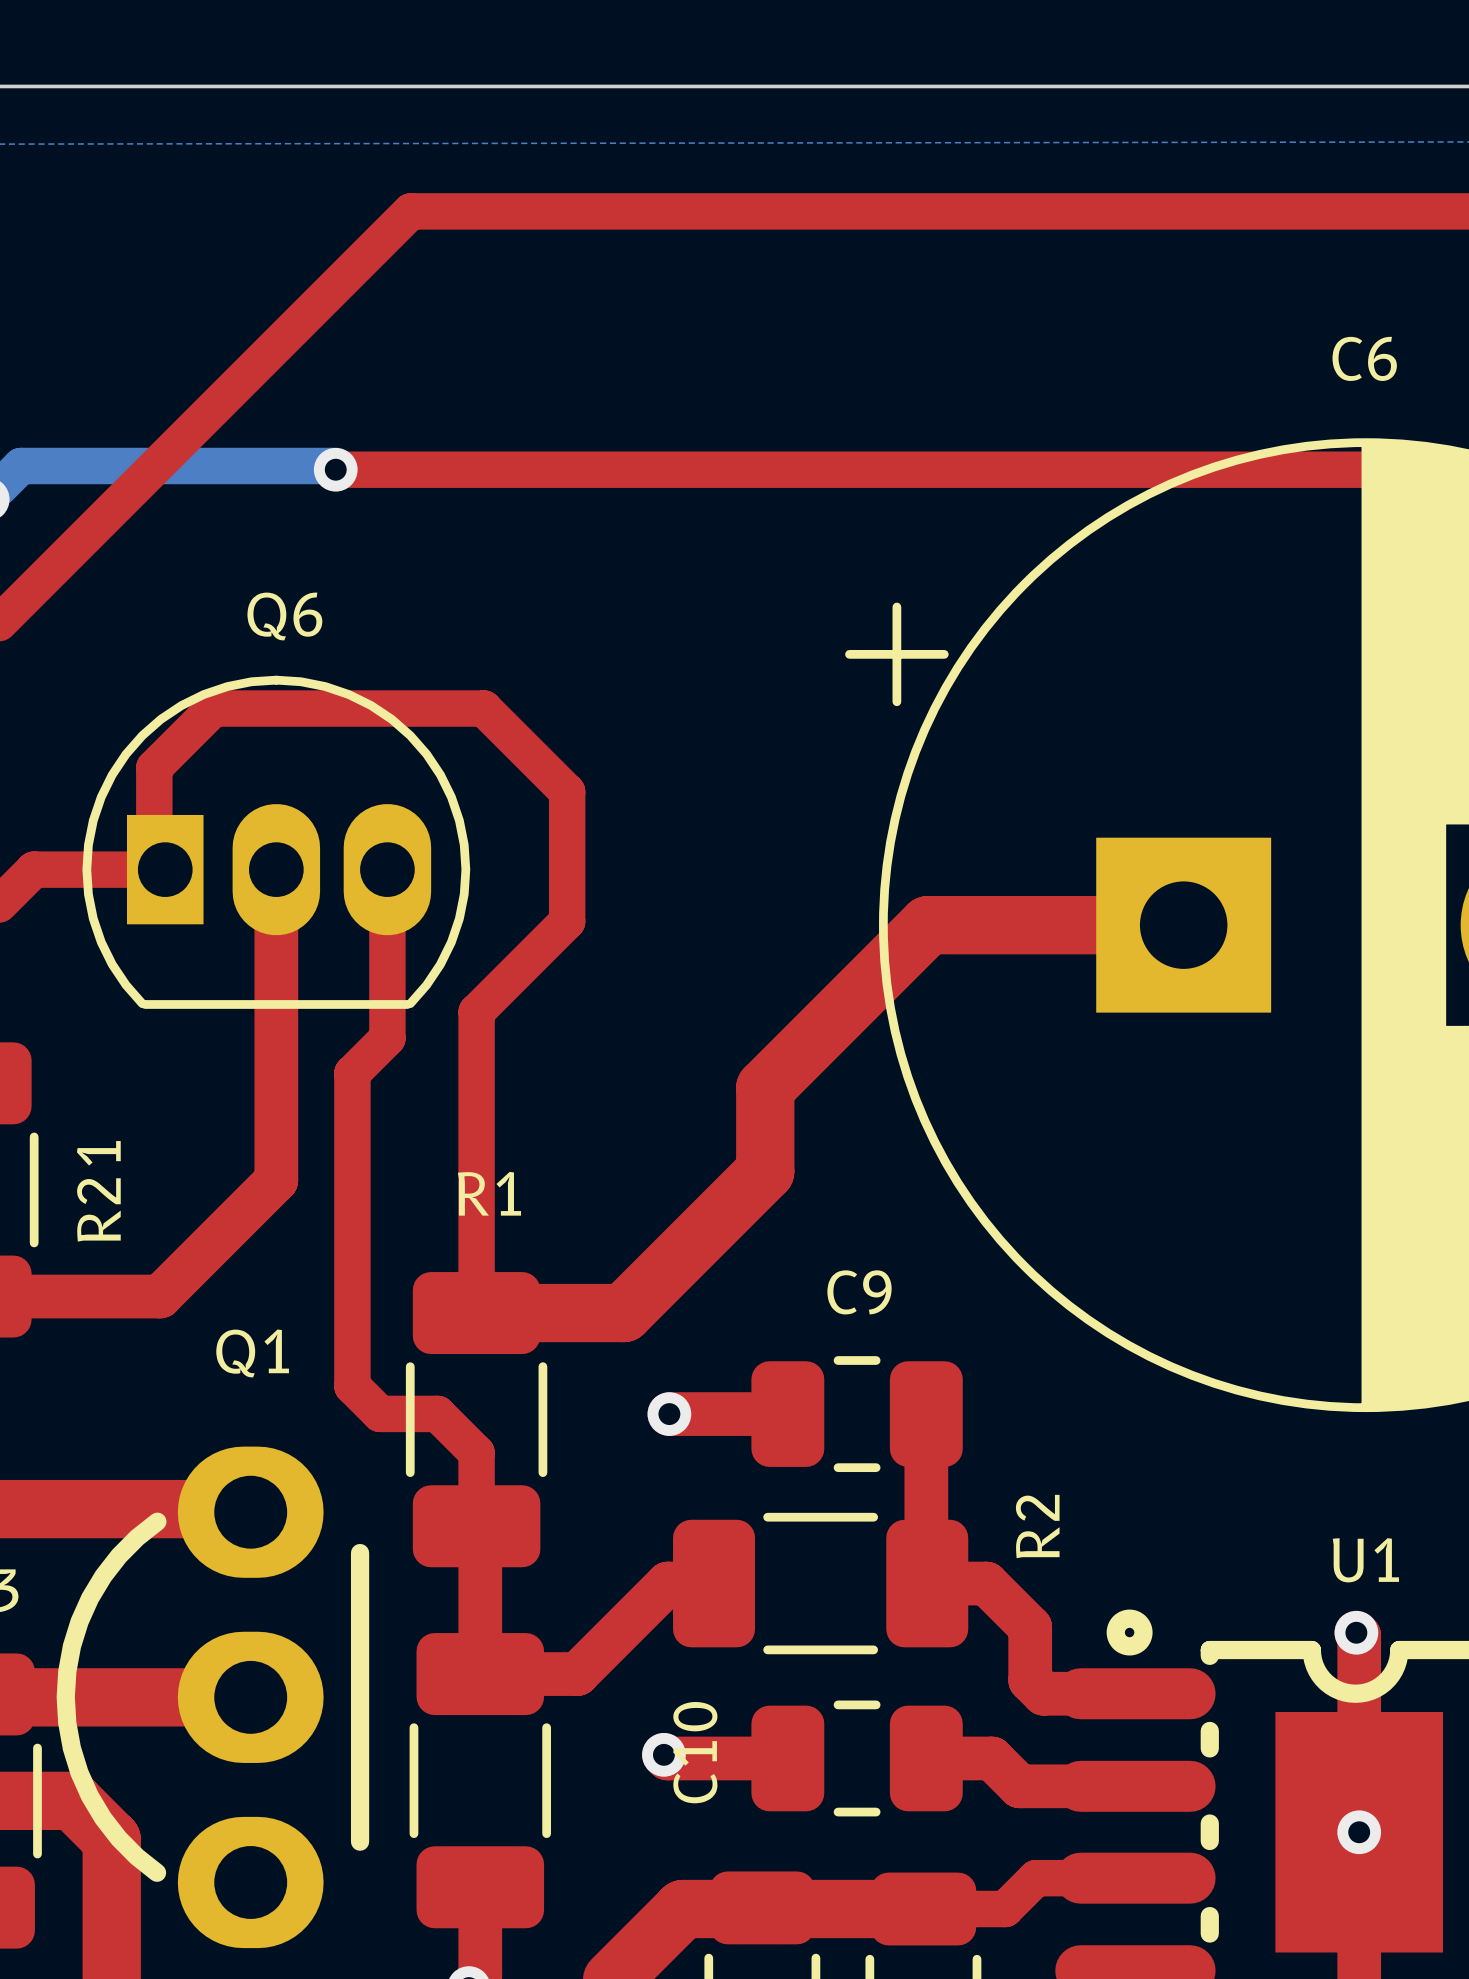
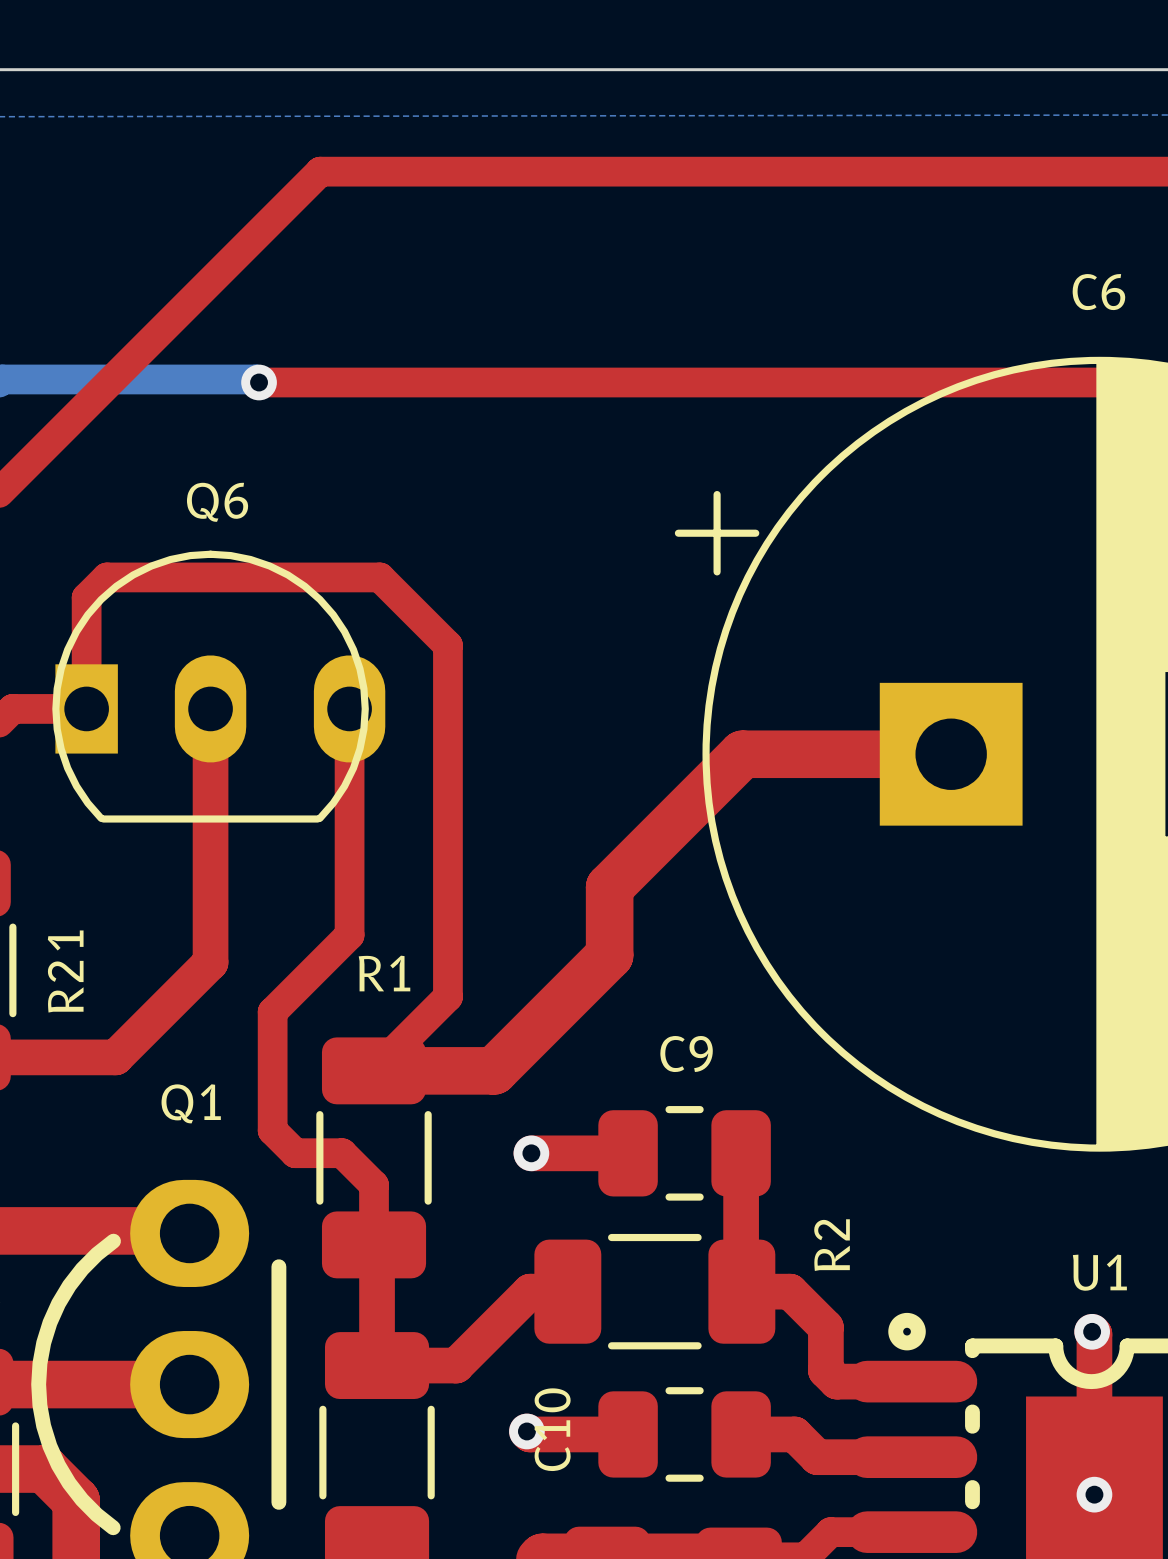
Q6 footprint: [82, 675, 471, 1009] -> [52, 550, 386, 823]
top track: (213, 708) (154, 767) (154, 869) (124, 869) -> (159, 577) (106, 577) (86, 597) (86, 708)
top track: (387, 869) (387, 1038) (352, 1073) (352, 1240) -> (349, 708) (349, 935) (272, 1012)
top track: (567, 921) (476, 1012) (476, 1313) -> (447, 751) (447, 996) (374, 1070)

